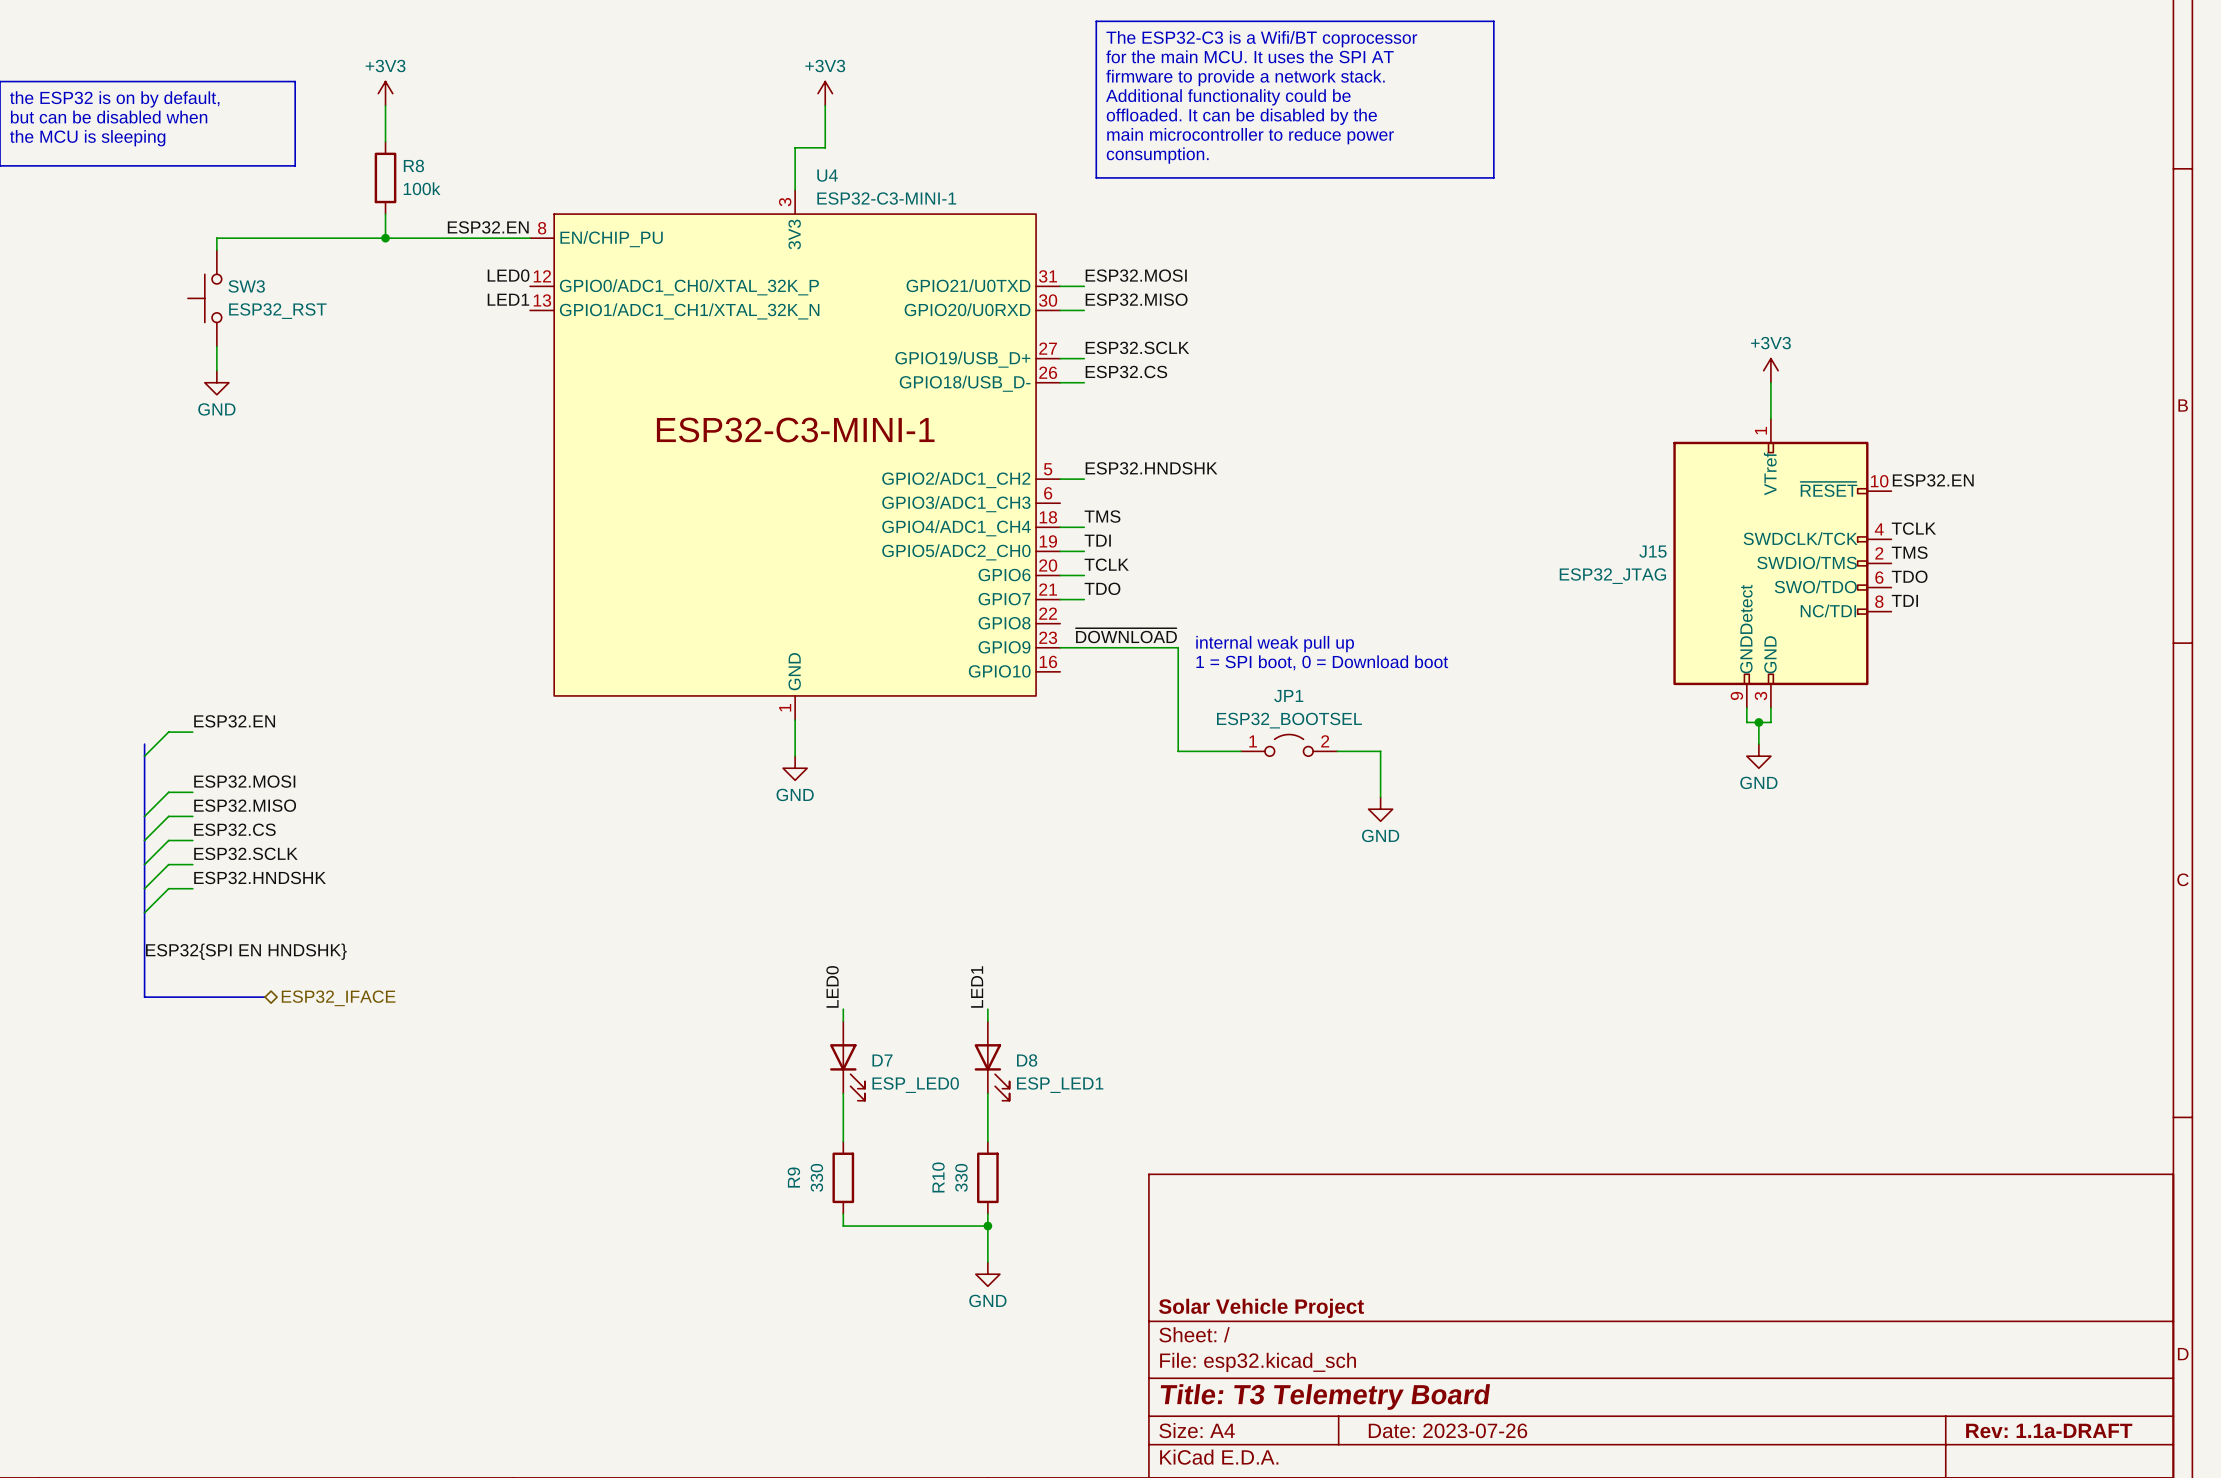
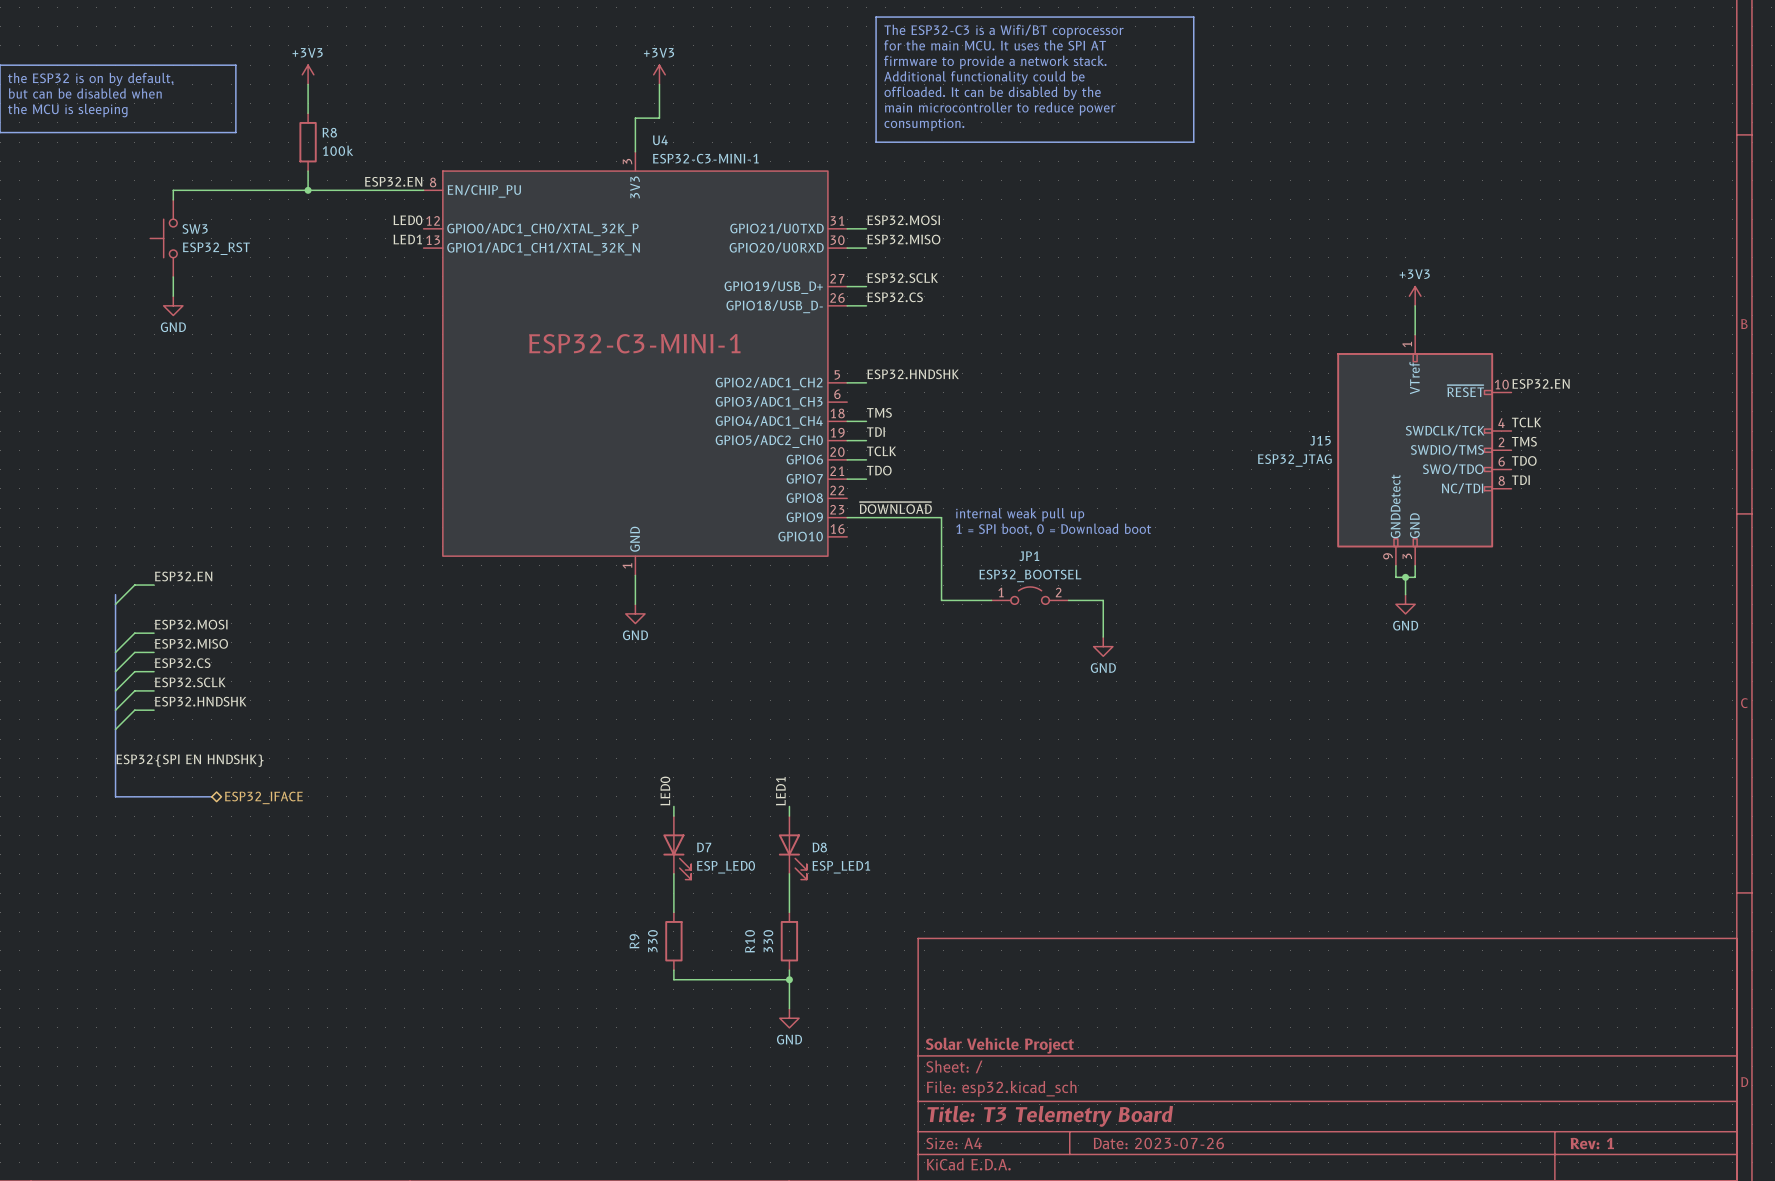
title block: Rev: 1.1a-DRAFT (2049, 1430) -> Rev: 1 (1592, 1143)

